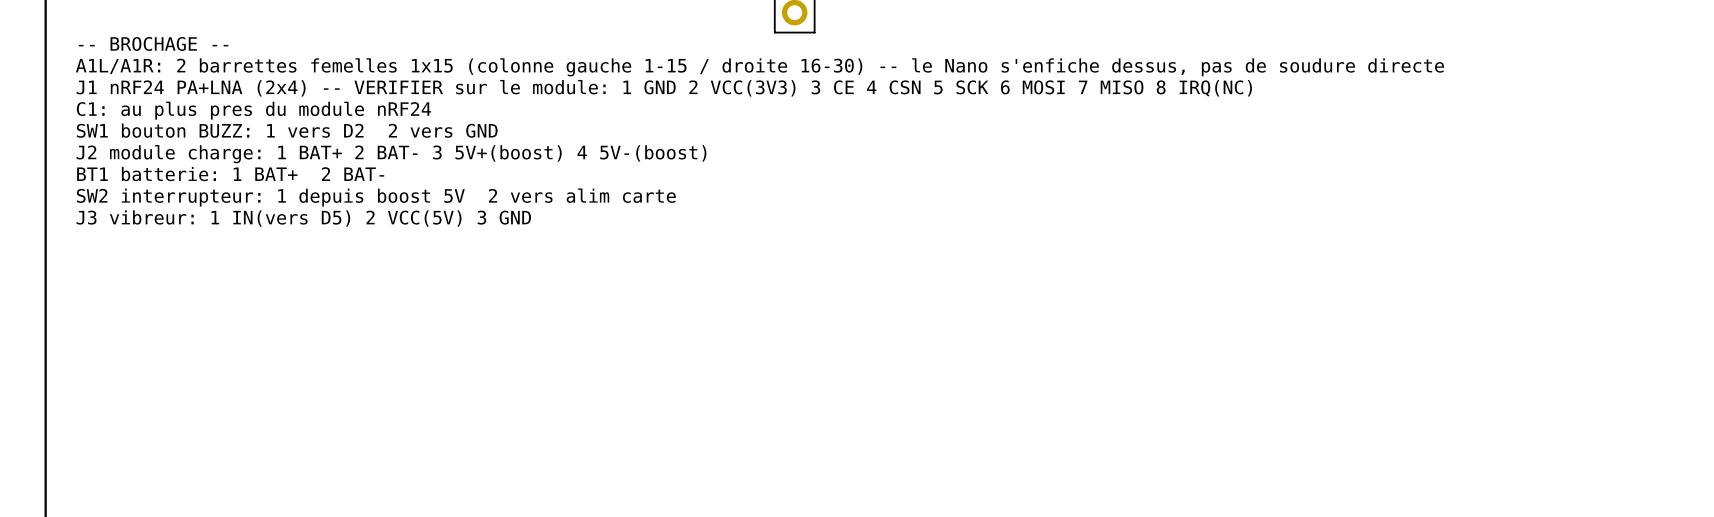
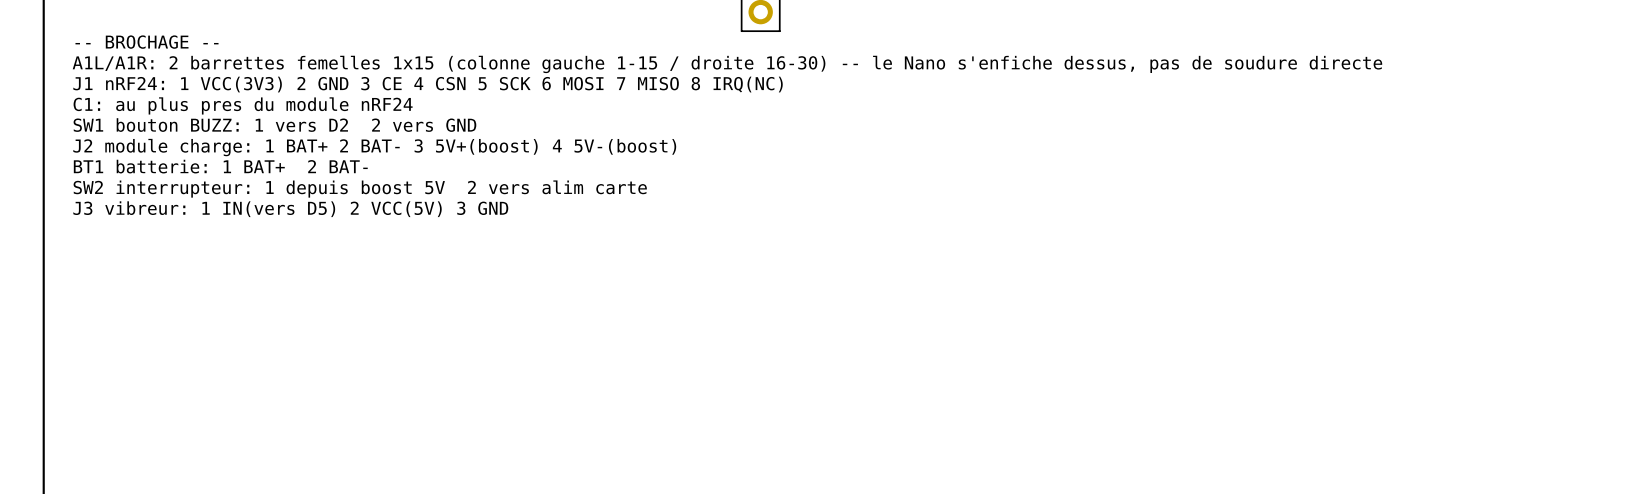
text: J1 nRF24 PA+LNA (2x4) -- VERIFIER sur le module: 1 GND 2 VCC(3V3) 3 CE 4 CSN 5 SCK 6 MOSI 7 MISO 8 IRQ(NC) (664, 88) -> J1 nRF24: 1 VCC(3V3) 2 GND 3 CE 4 CSN 5 SCK 6 MOSI 7 MISO 8 IRQ(NC) (428, 84)

